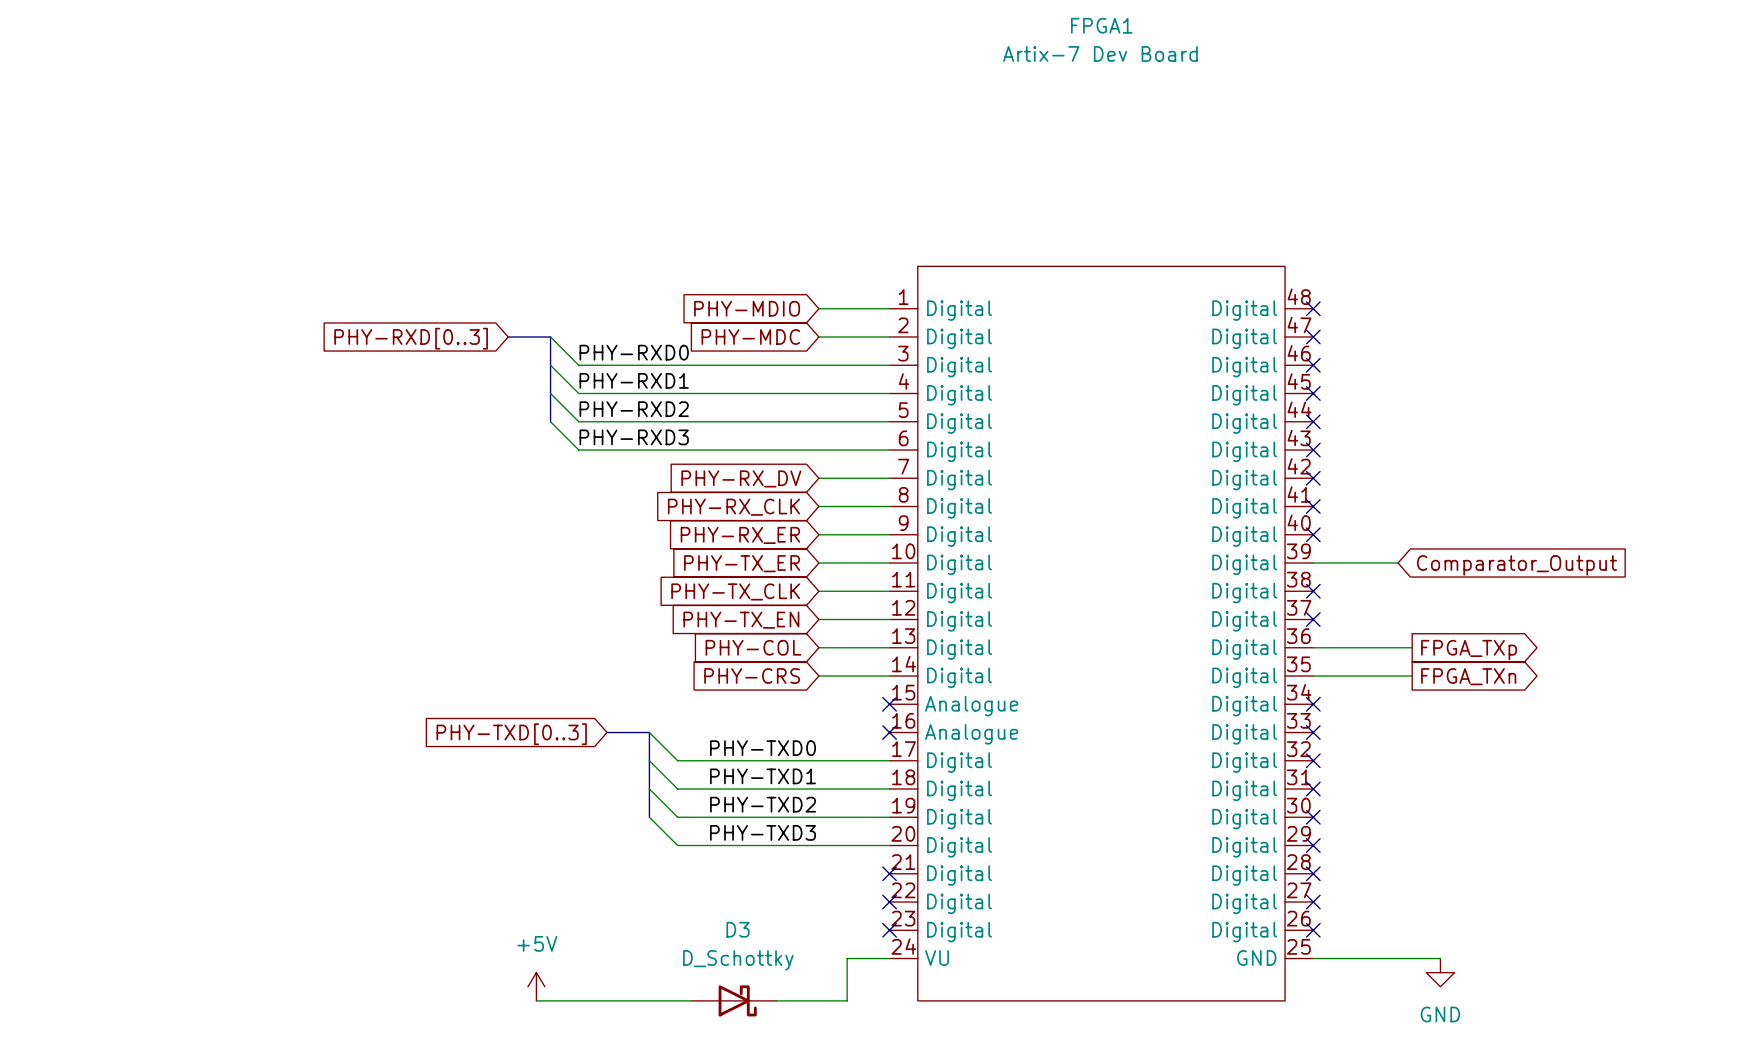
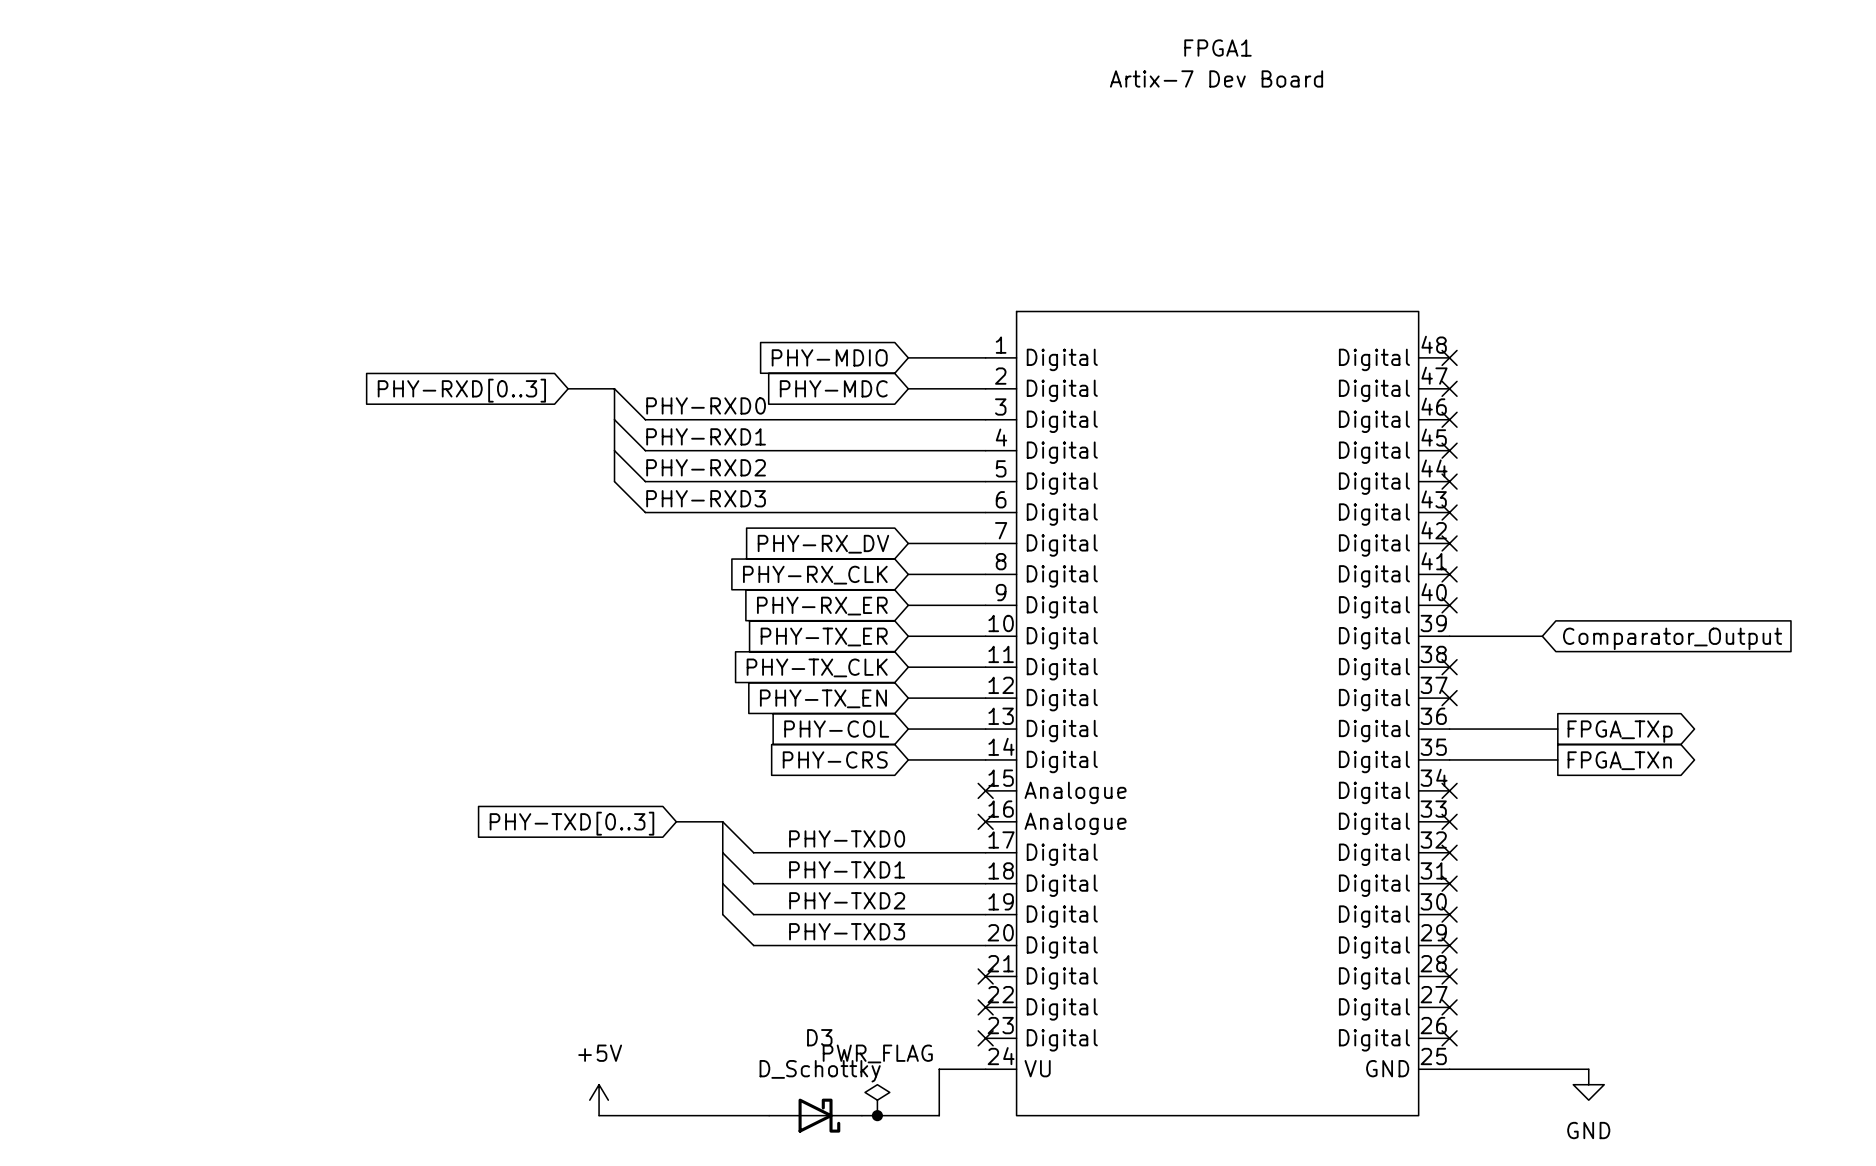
power symbol: none -> PWR_FLAG (877, 1100)
junction: none -> (877, 1115)

